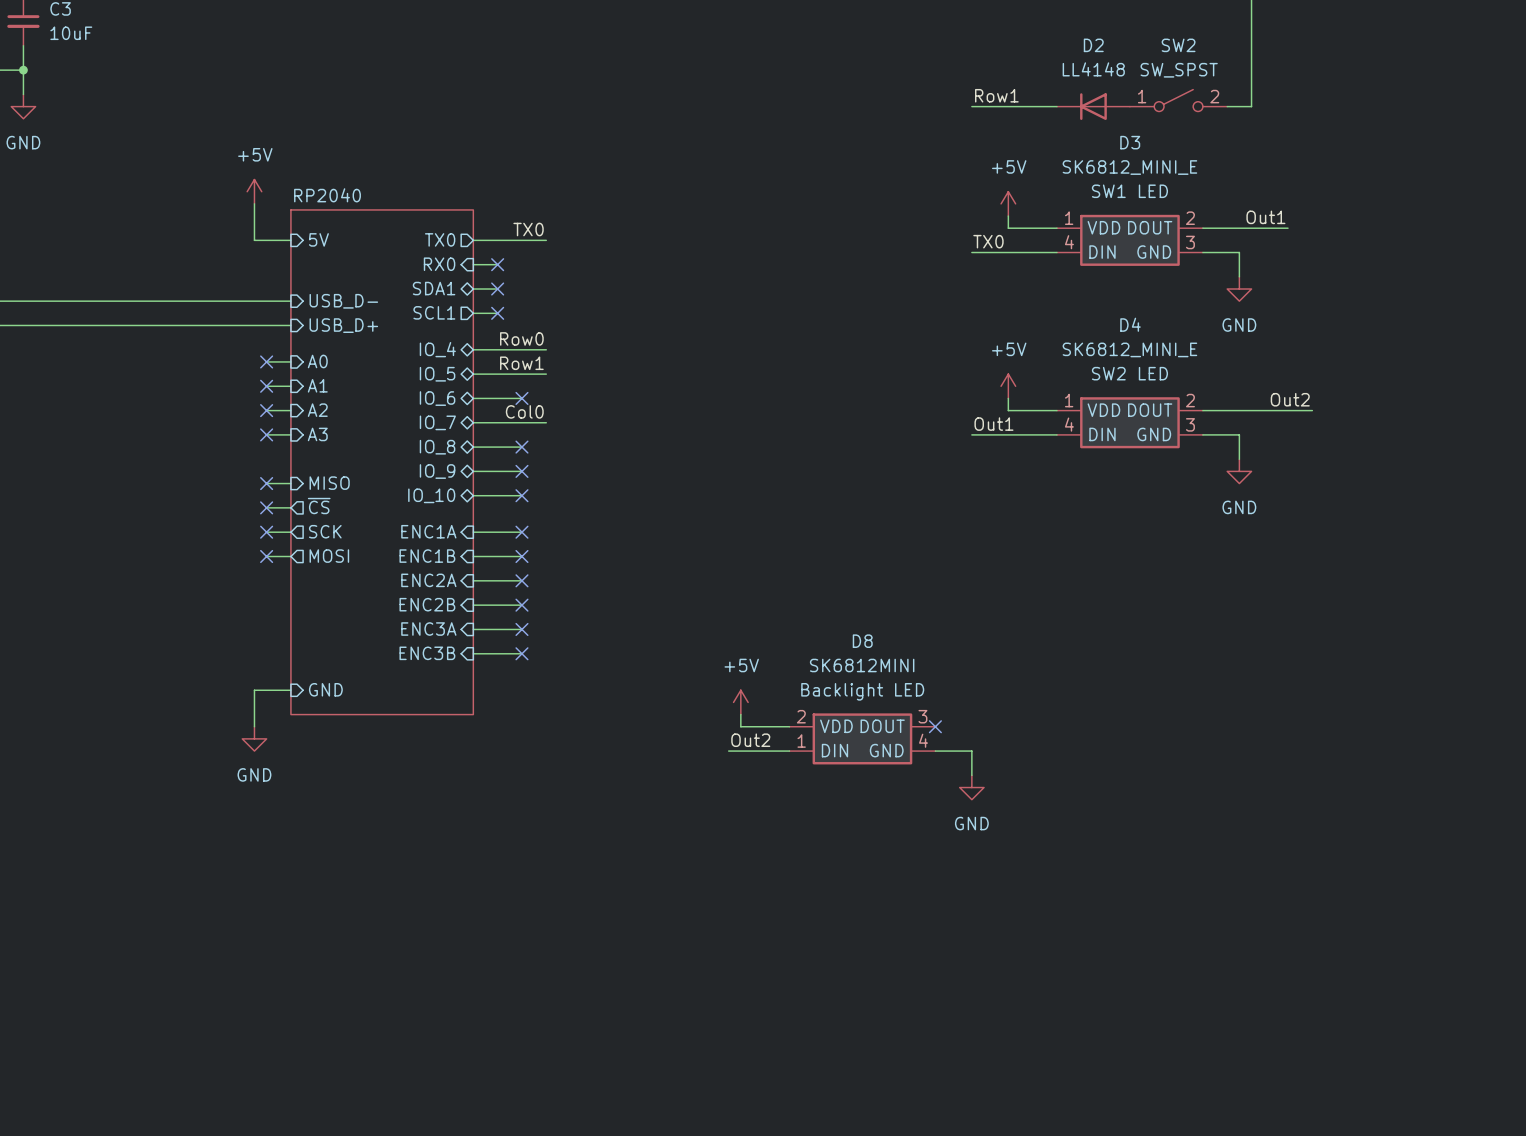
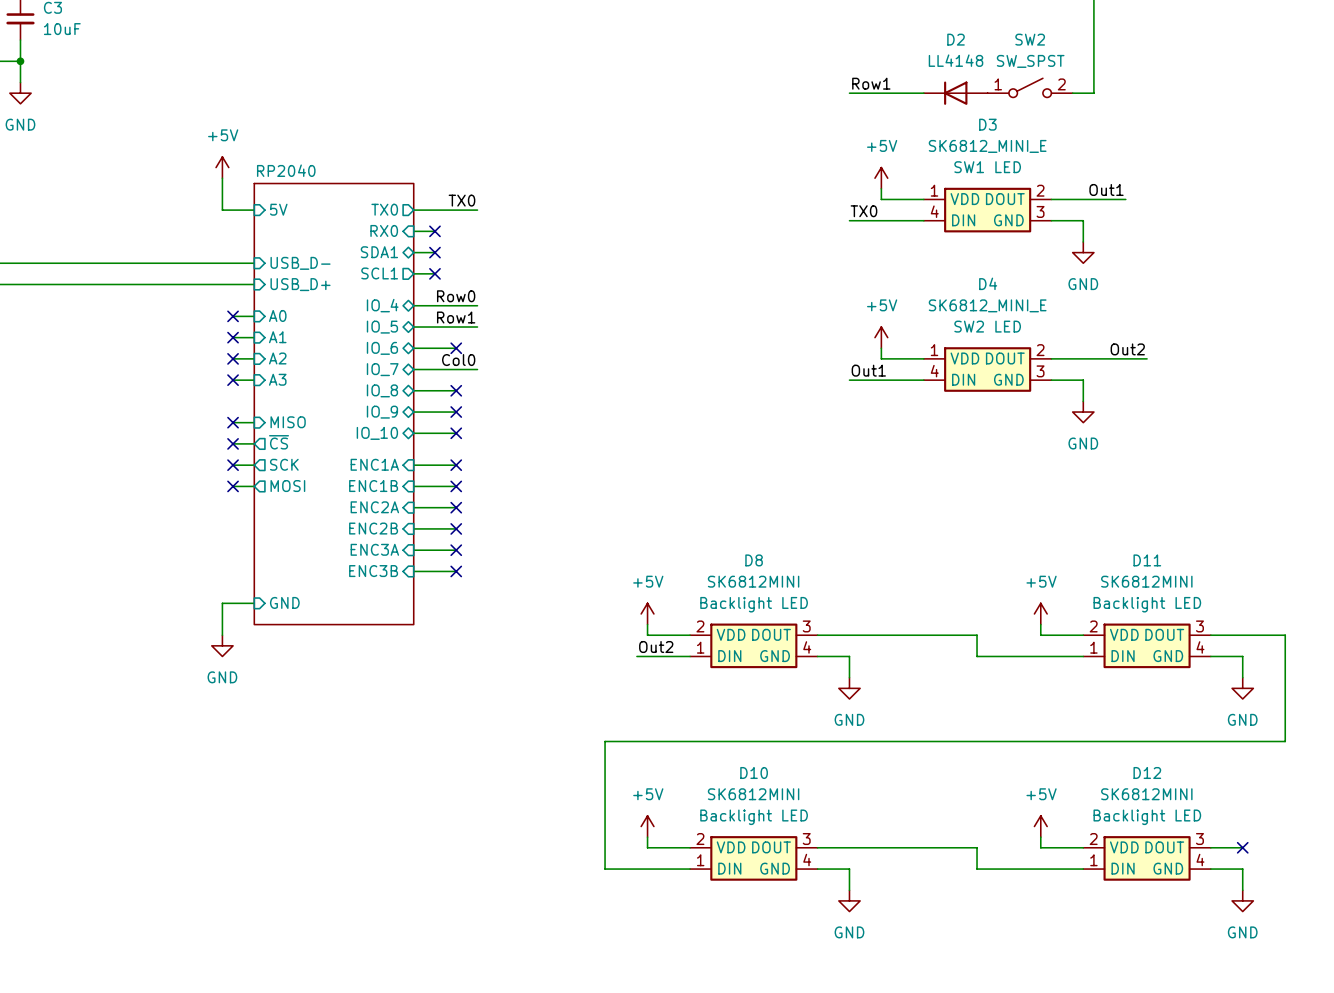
power symbol: none -> +5V (1040, 613)
wire: none -> (1040, 624) (1040, 635) (1083, 635)
wire: none -> (817, 635) (977, 635) (977, 656) (1083, 656)
no-connect mark: (935, 726) -> none
wire: none -> (1210, 635) (1285, 635) (1285, 741) (605, 741) (605, 869) (690, 869)
D11: none -> SK6812MINI (1147, 645)
wire: none -> (1210, 656) (1242, 656) (1242, 677)
power symbol: none -> GND (1242, 688)
power symbol: none -> +5V (647, 826)
power symbol: none -> +5V (1040, 826)
wire: none -> (647, 837) (647, 847) (690, 847)
wire: none -> (1040, 837) (1040, 847) (1083, 847)
wire: none -> (817, 847) (977, 847) (977, 869) (1083, 869)
wire: none -> (1210, 847) (1242, 847)
no-connect mark: none -> (1242, 847)
D10: none -> SK6812MINI (753, 858)
D12: none -> SK6812MINI (1147, 858)
wire: none -> (817, 869) (849, 869) (849, 890)
wire: none -> (1210, 869) (1242, 869) (1242, 890)
power symbol: none -> GND (849, 900)
power symbol: none -> GND (1242, 900)

